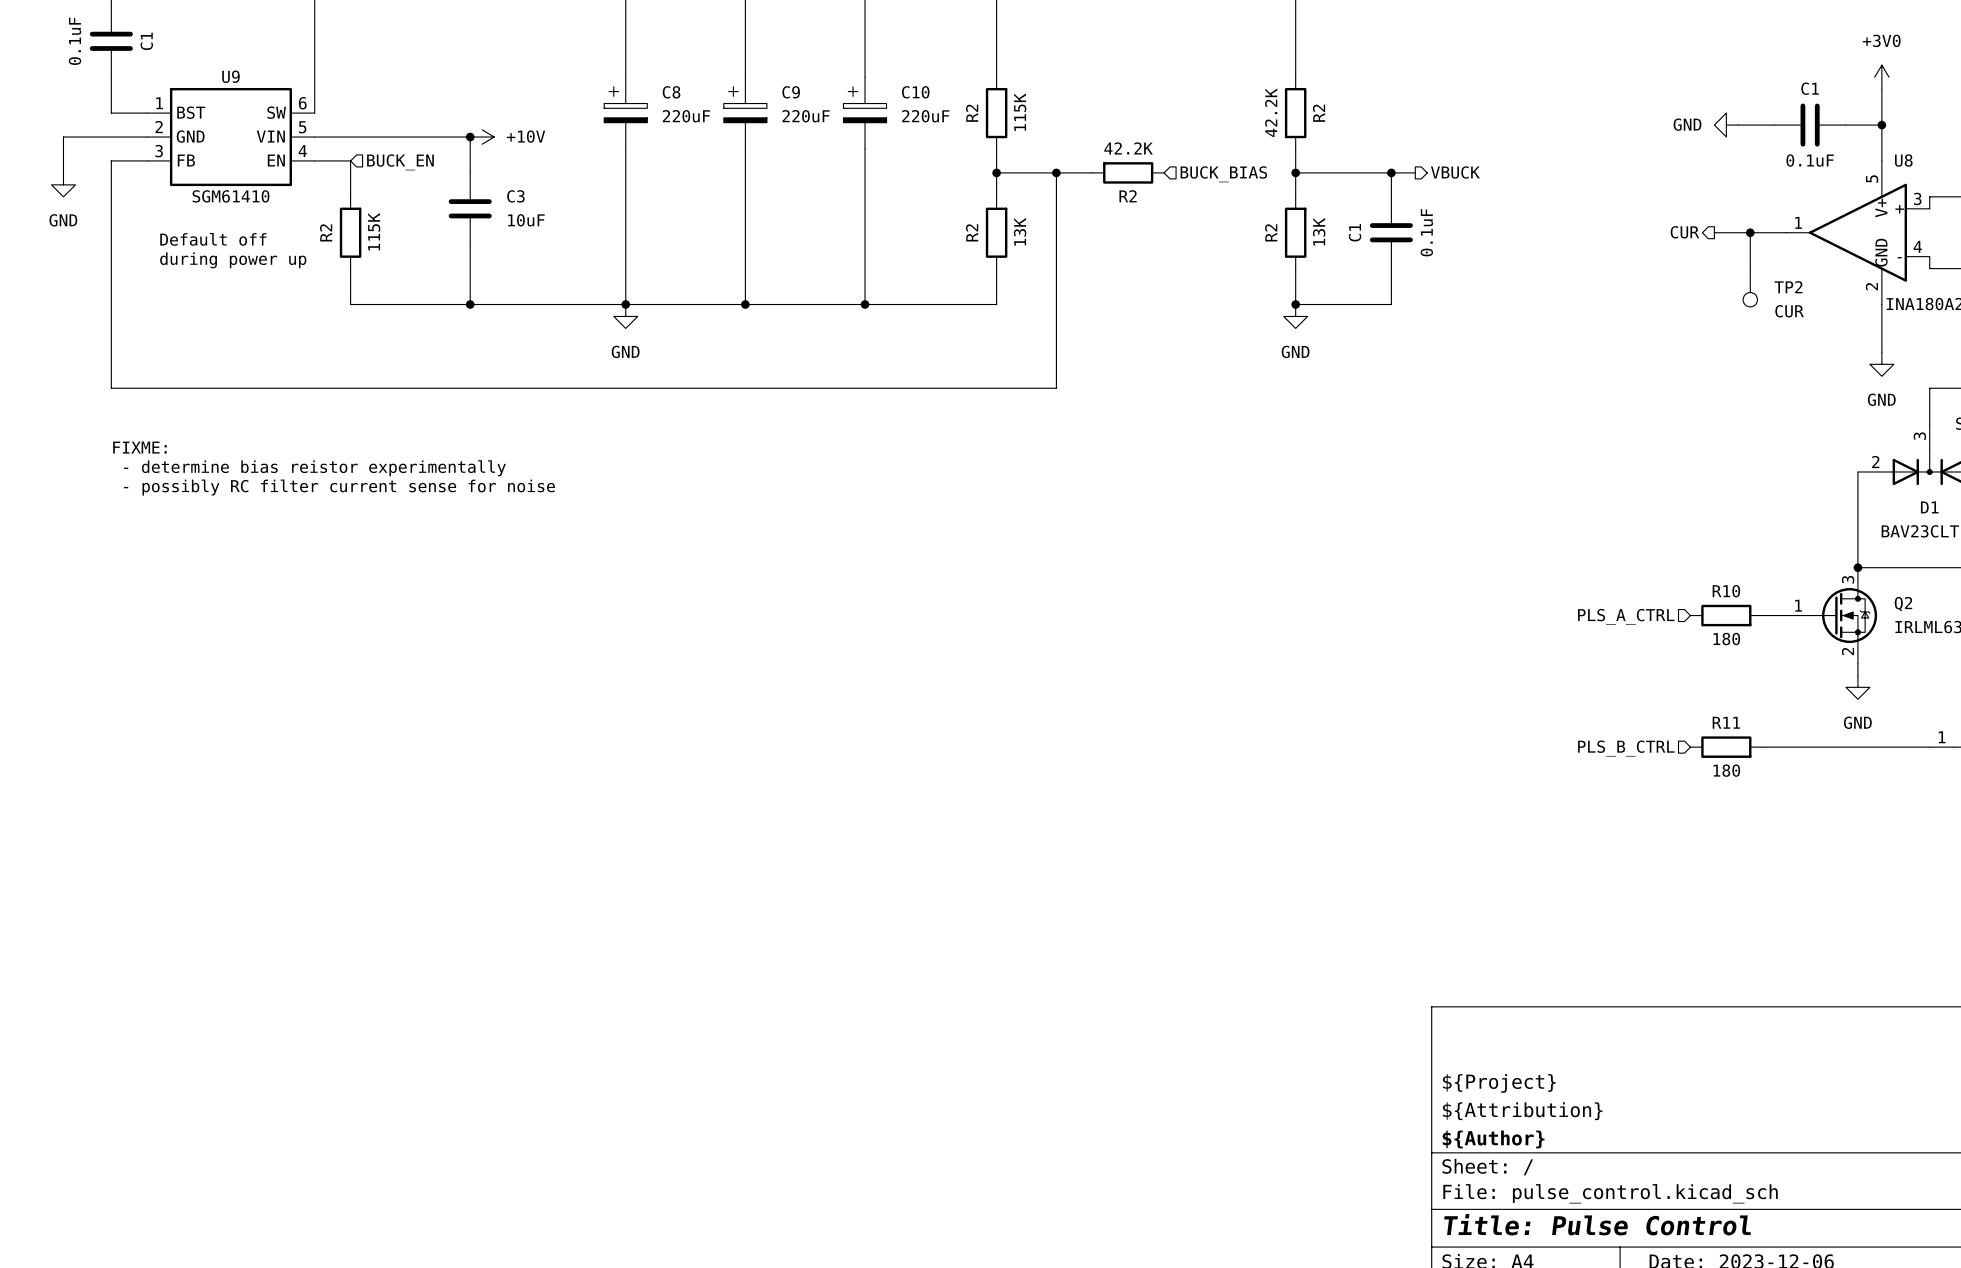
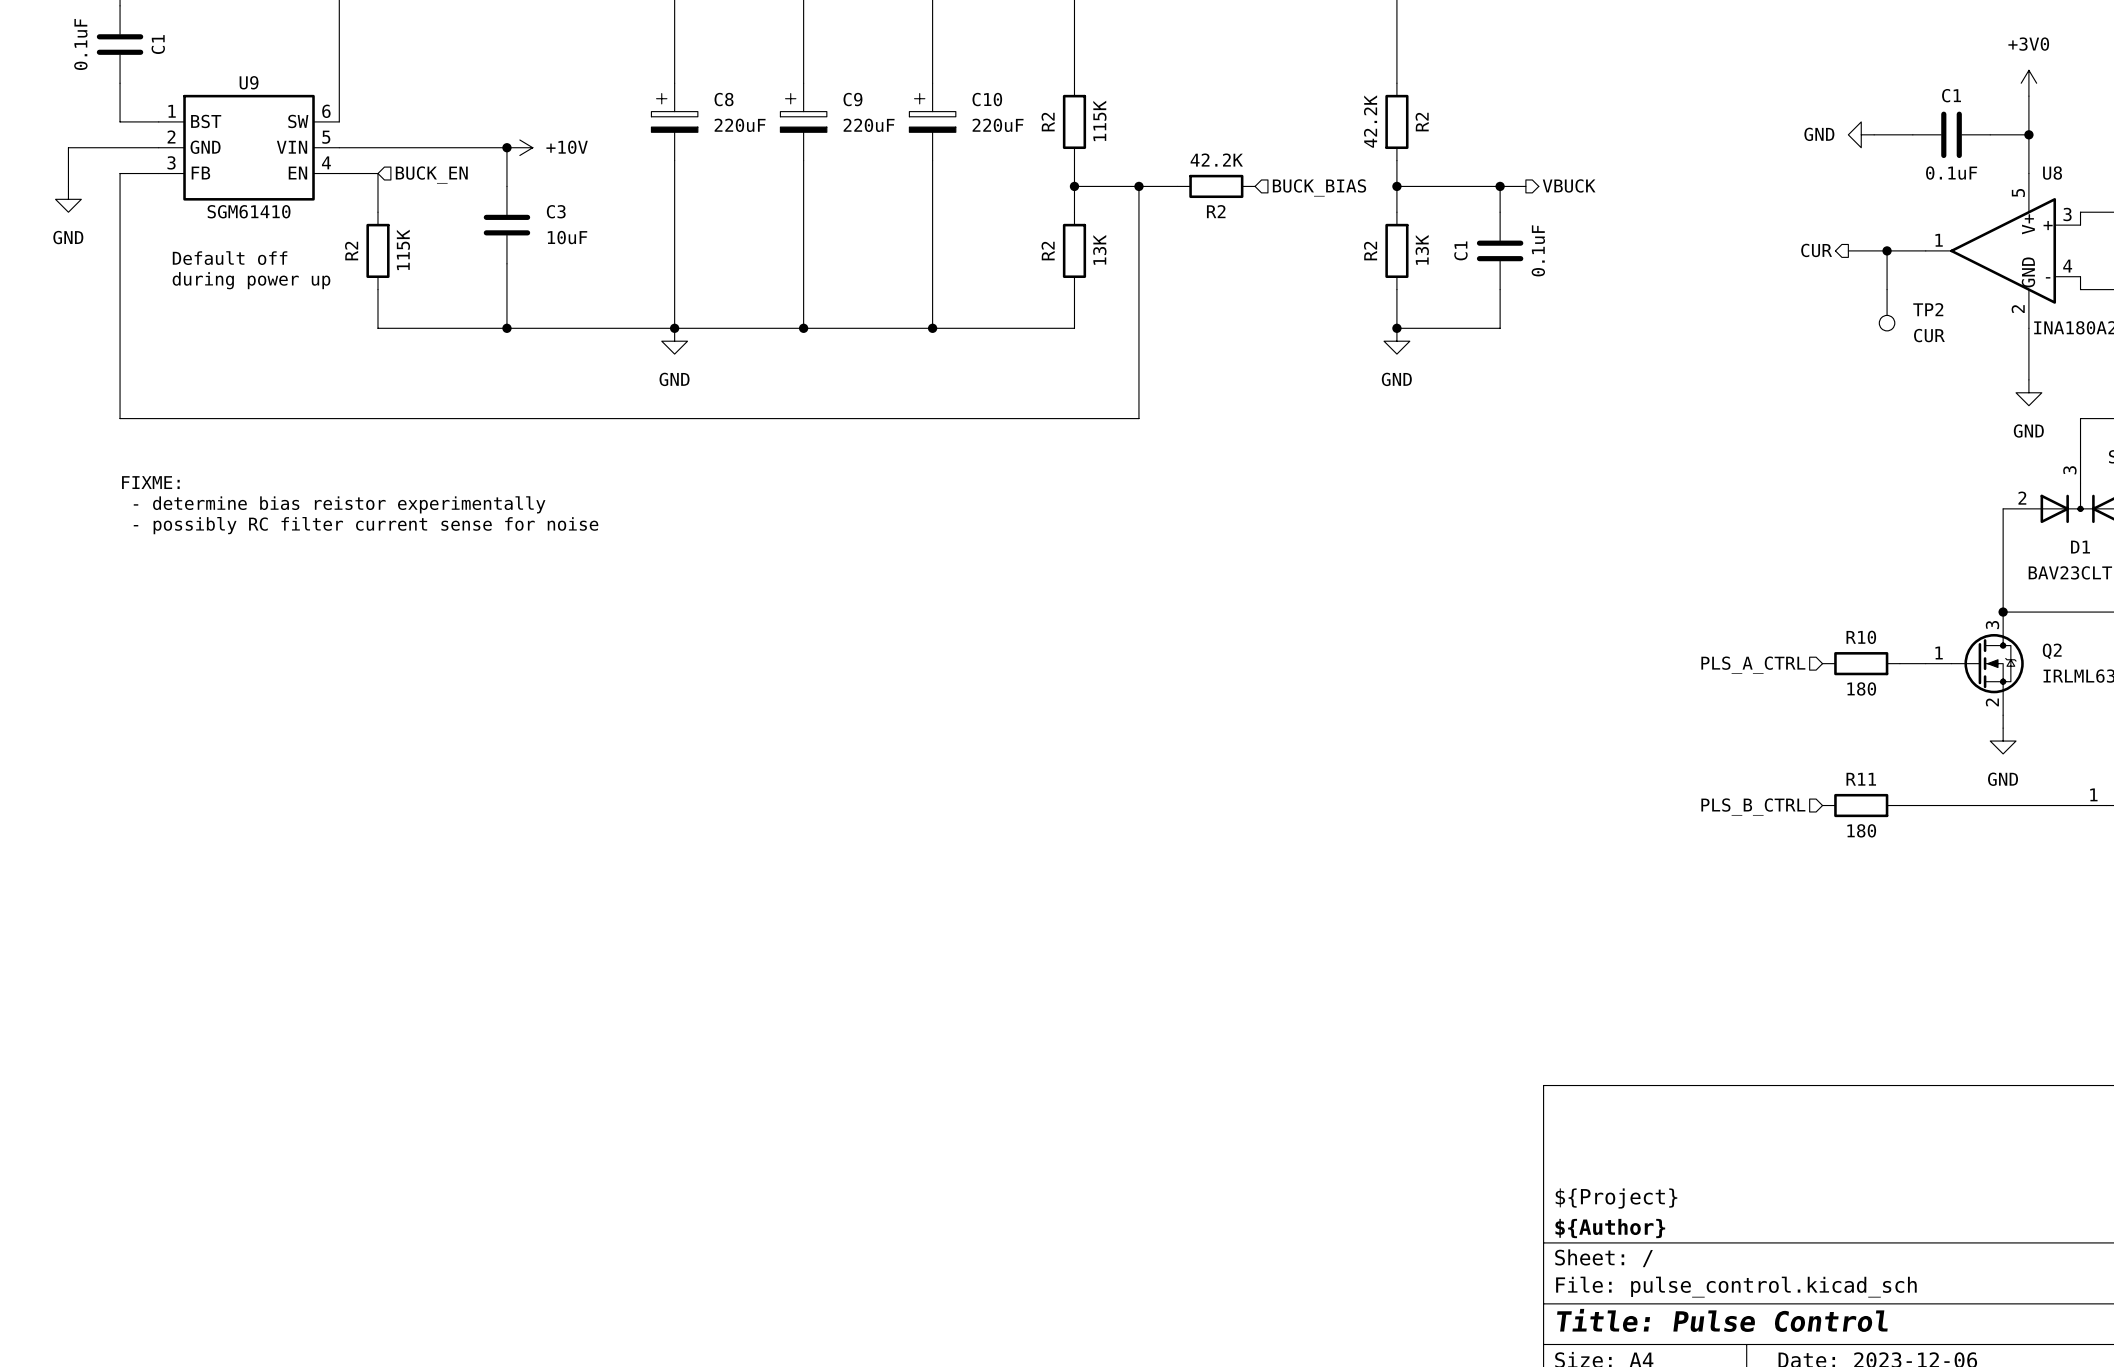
title block: ${Project} (1499, 1083) -> none
title block: ${Attribution} (1522, 1111) -> ${Project} (1616, 1198)

